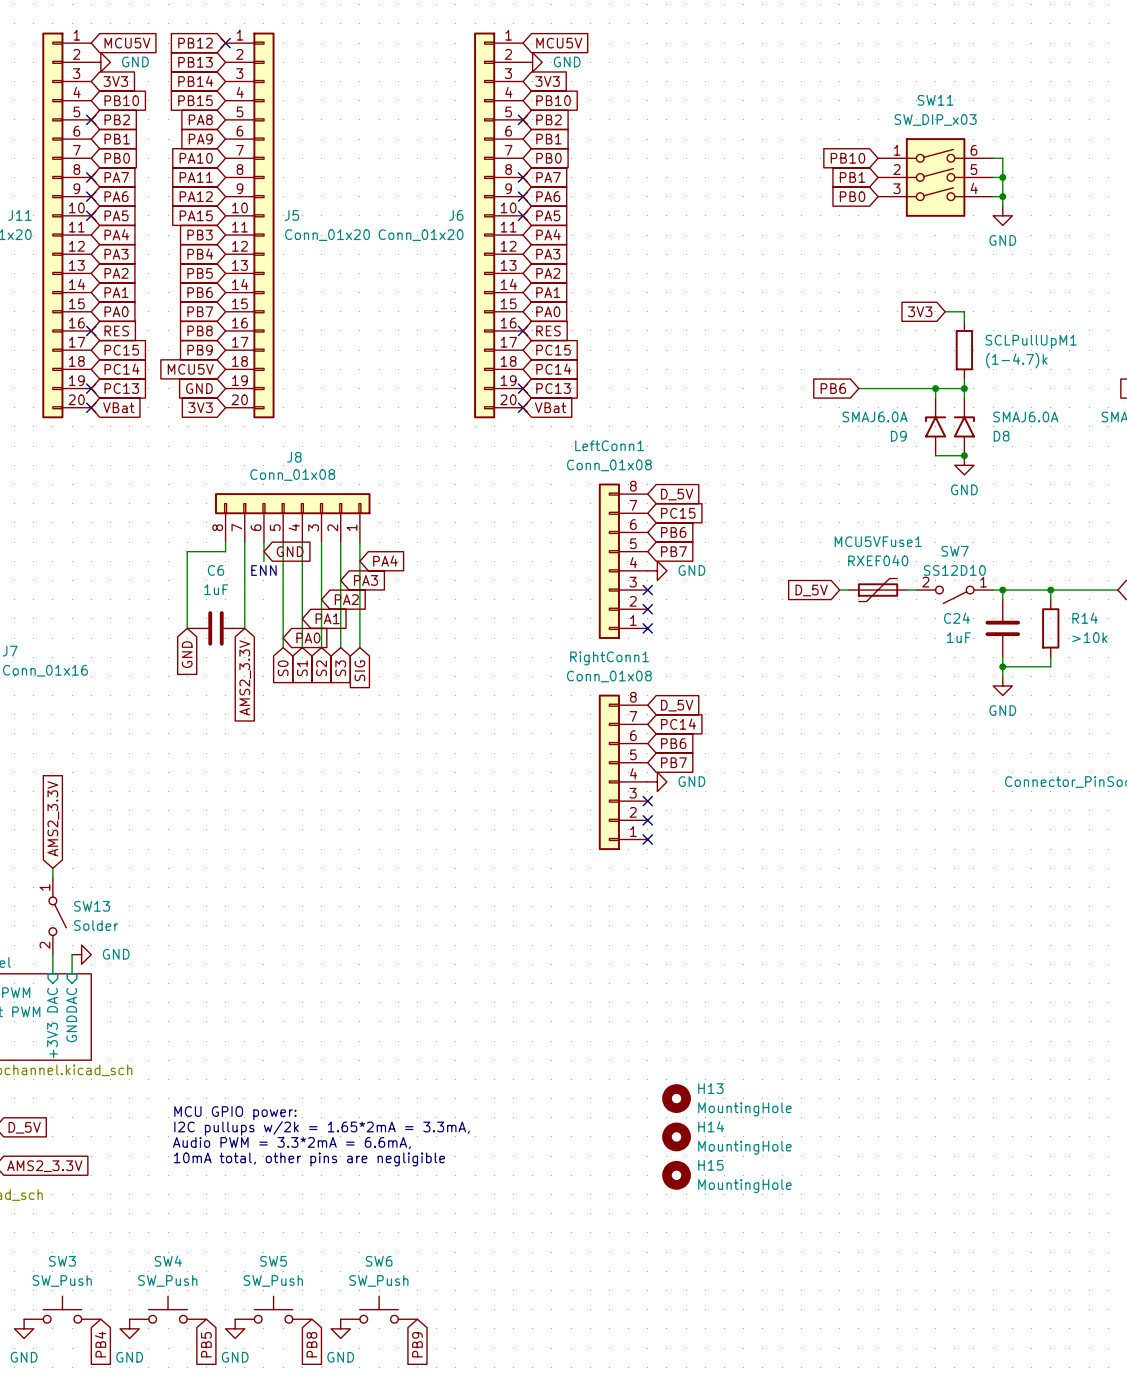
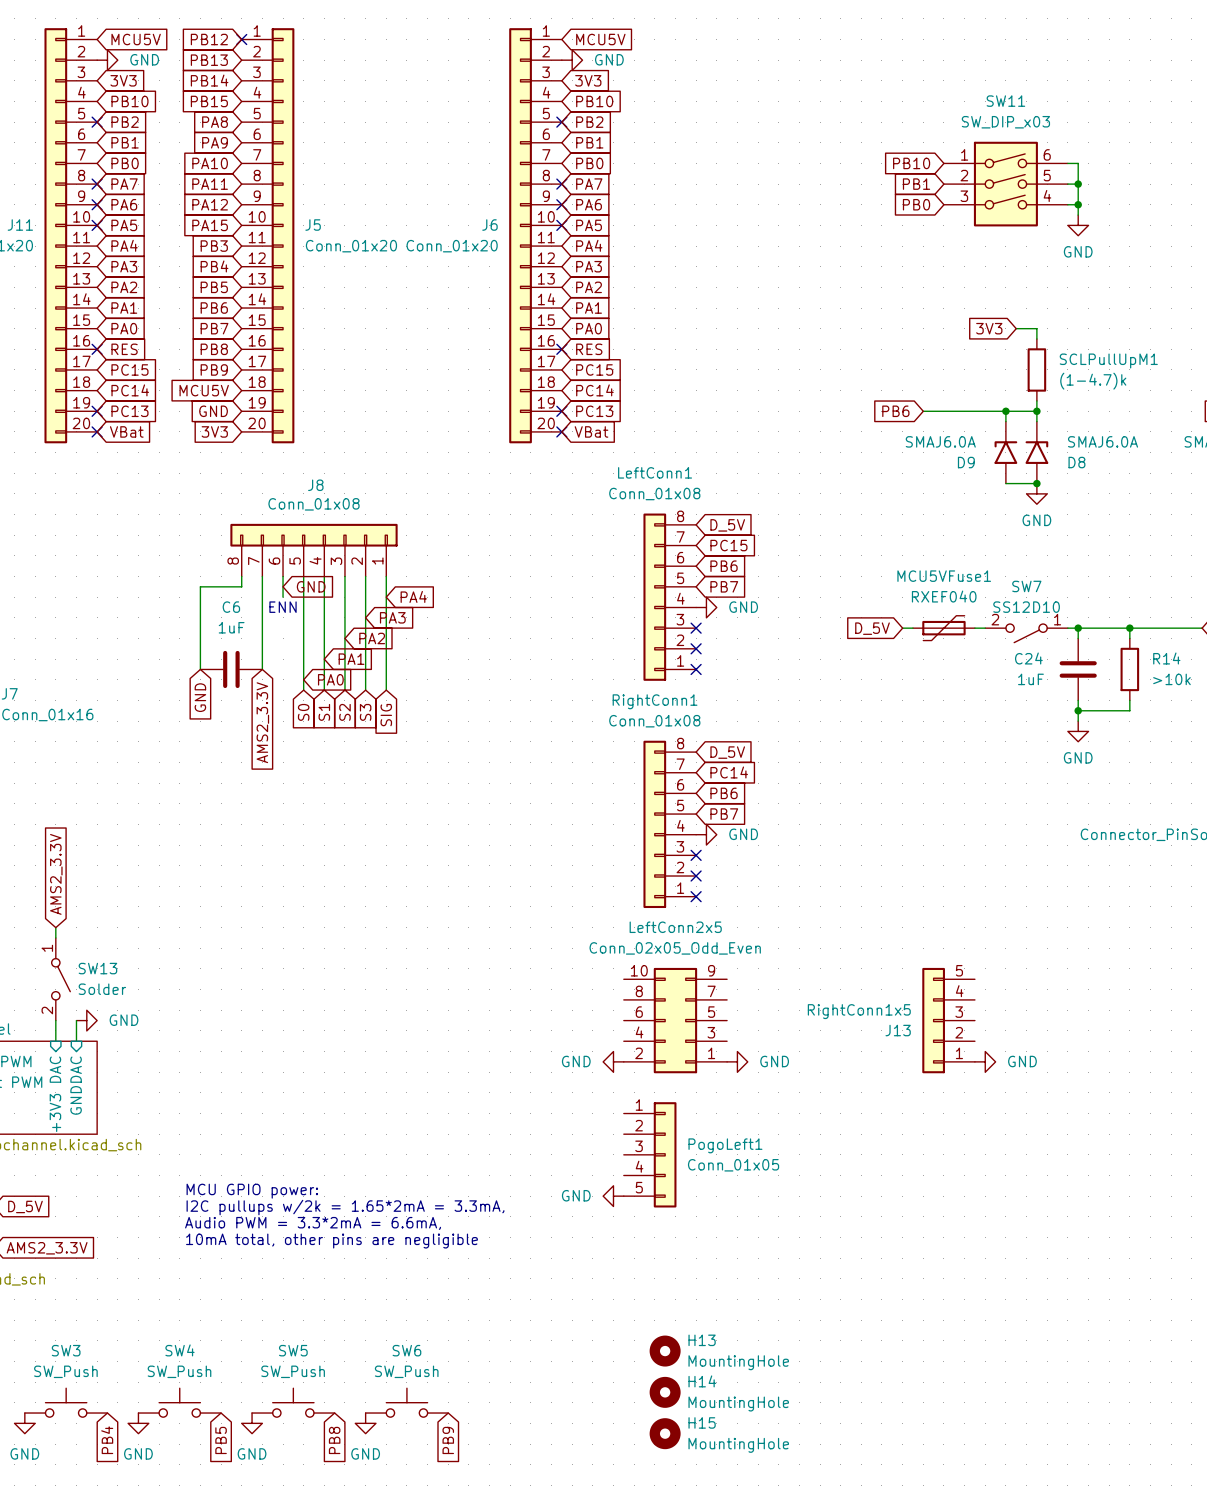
LeftConn2x5: none -> Conn_02x05_Odd_Even (675, 1020)
J13: none -> RightConn1x5 (948, 1020)
power symbol: none -> GND (613, 1061)
power symbol: none -> GND (737, 1061)
power symbol: none -> GND (985, 1061)
PogoLeft1: none -> Conn_01x05 (650, 1154)
H13 position: (676, 1098) -> (665, 1351)
power symbol: none -> GND (613, 1196)
H14 position: (676, 1136) -> (665, 1392)
H15 position: (676, 1175) -> (665, 1433)

